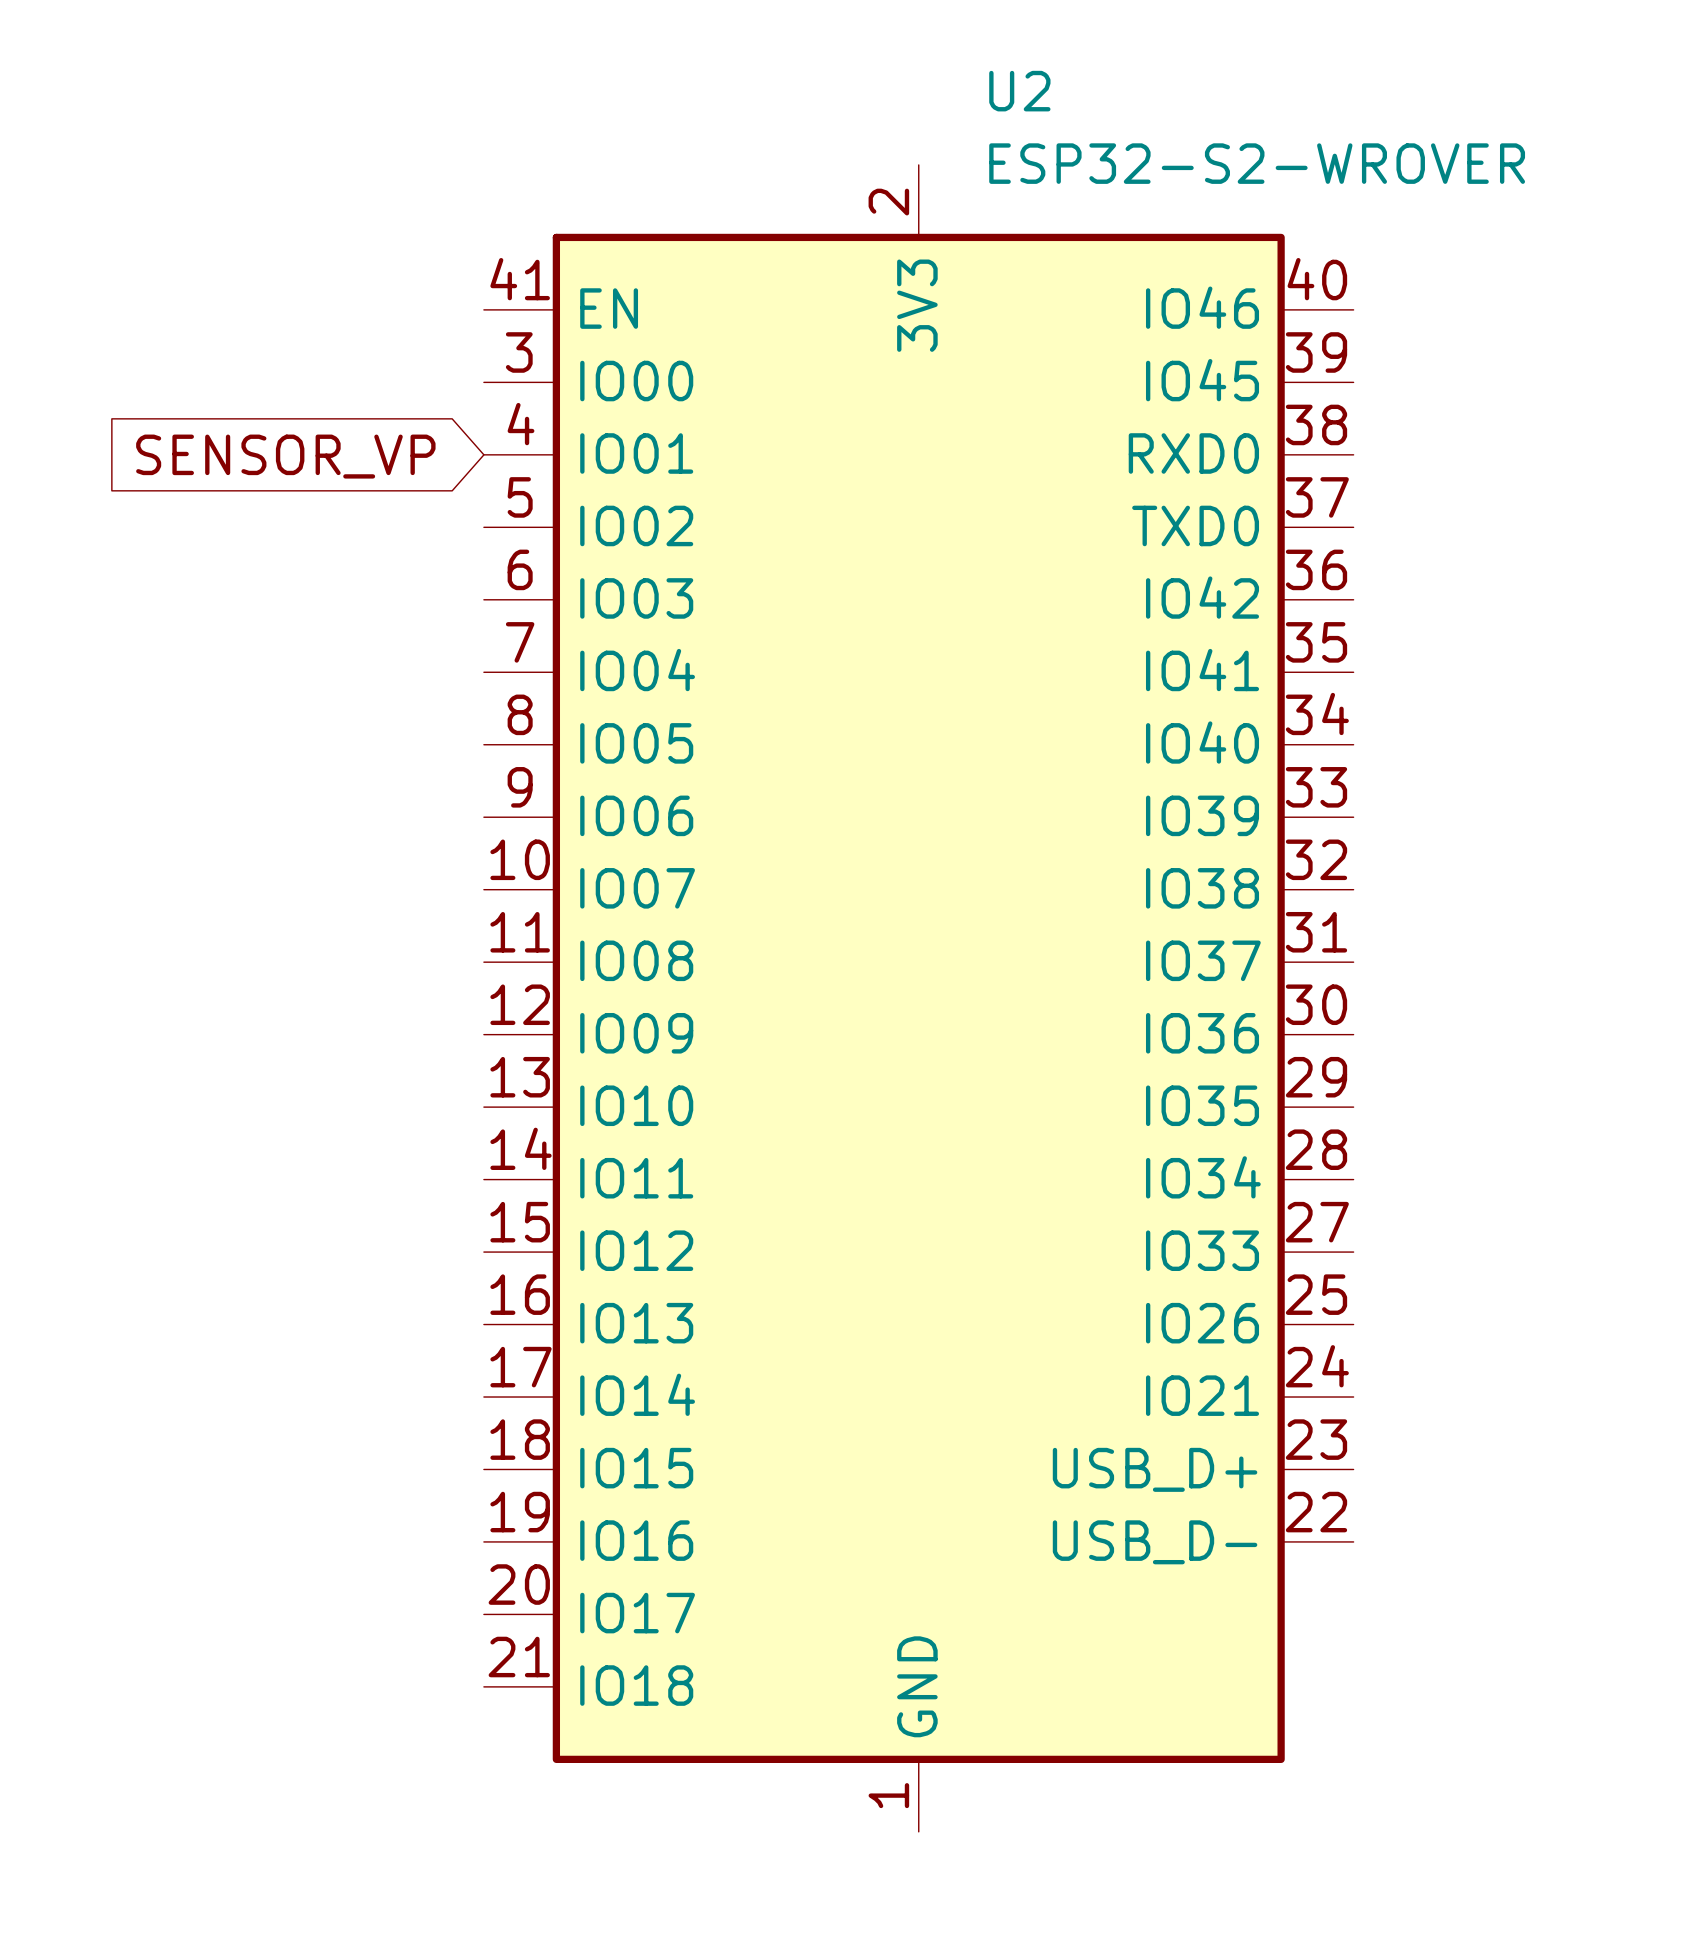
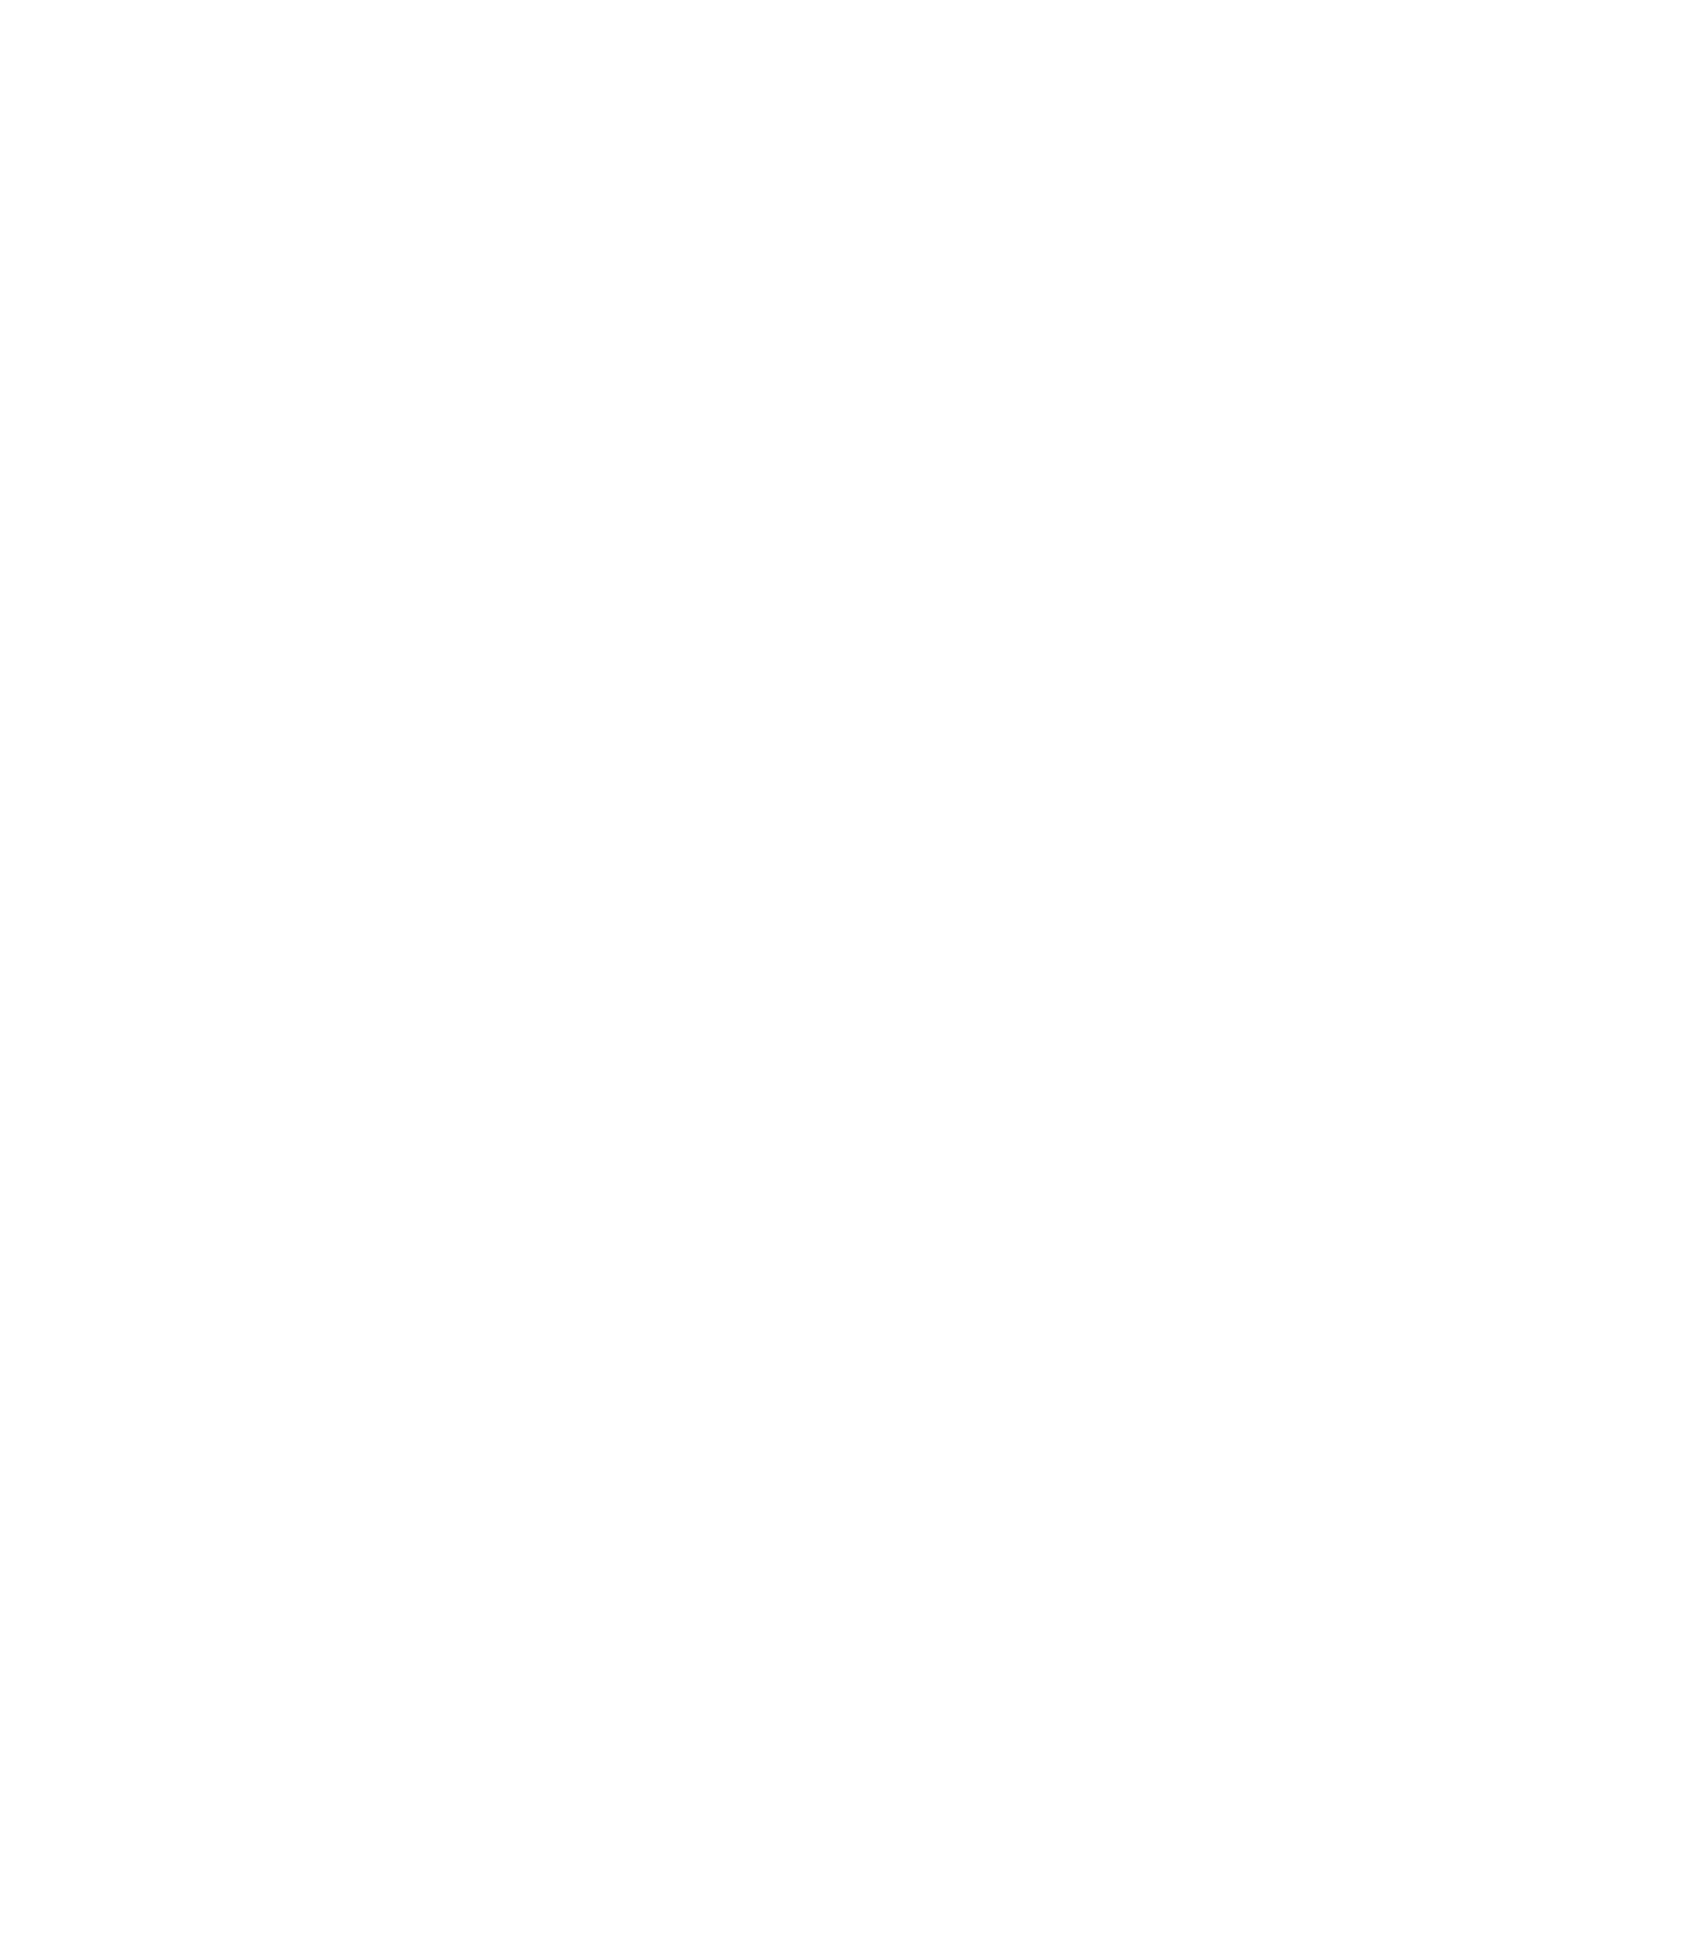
global label: SENSOR_VP (285, 456) -> none
U2: ESP32-S2-WROVER (918, 998) -> none

